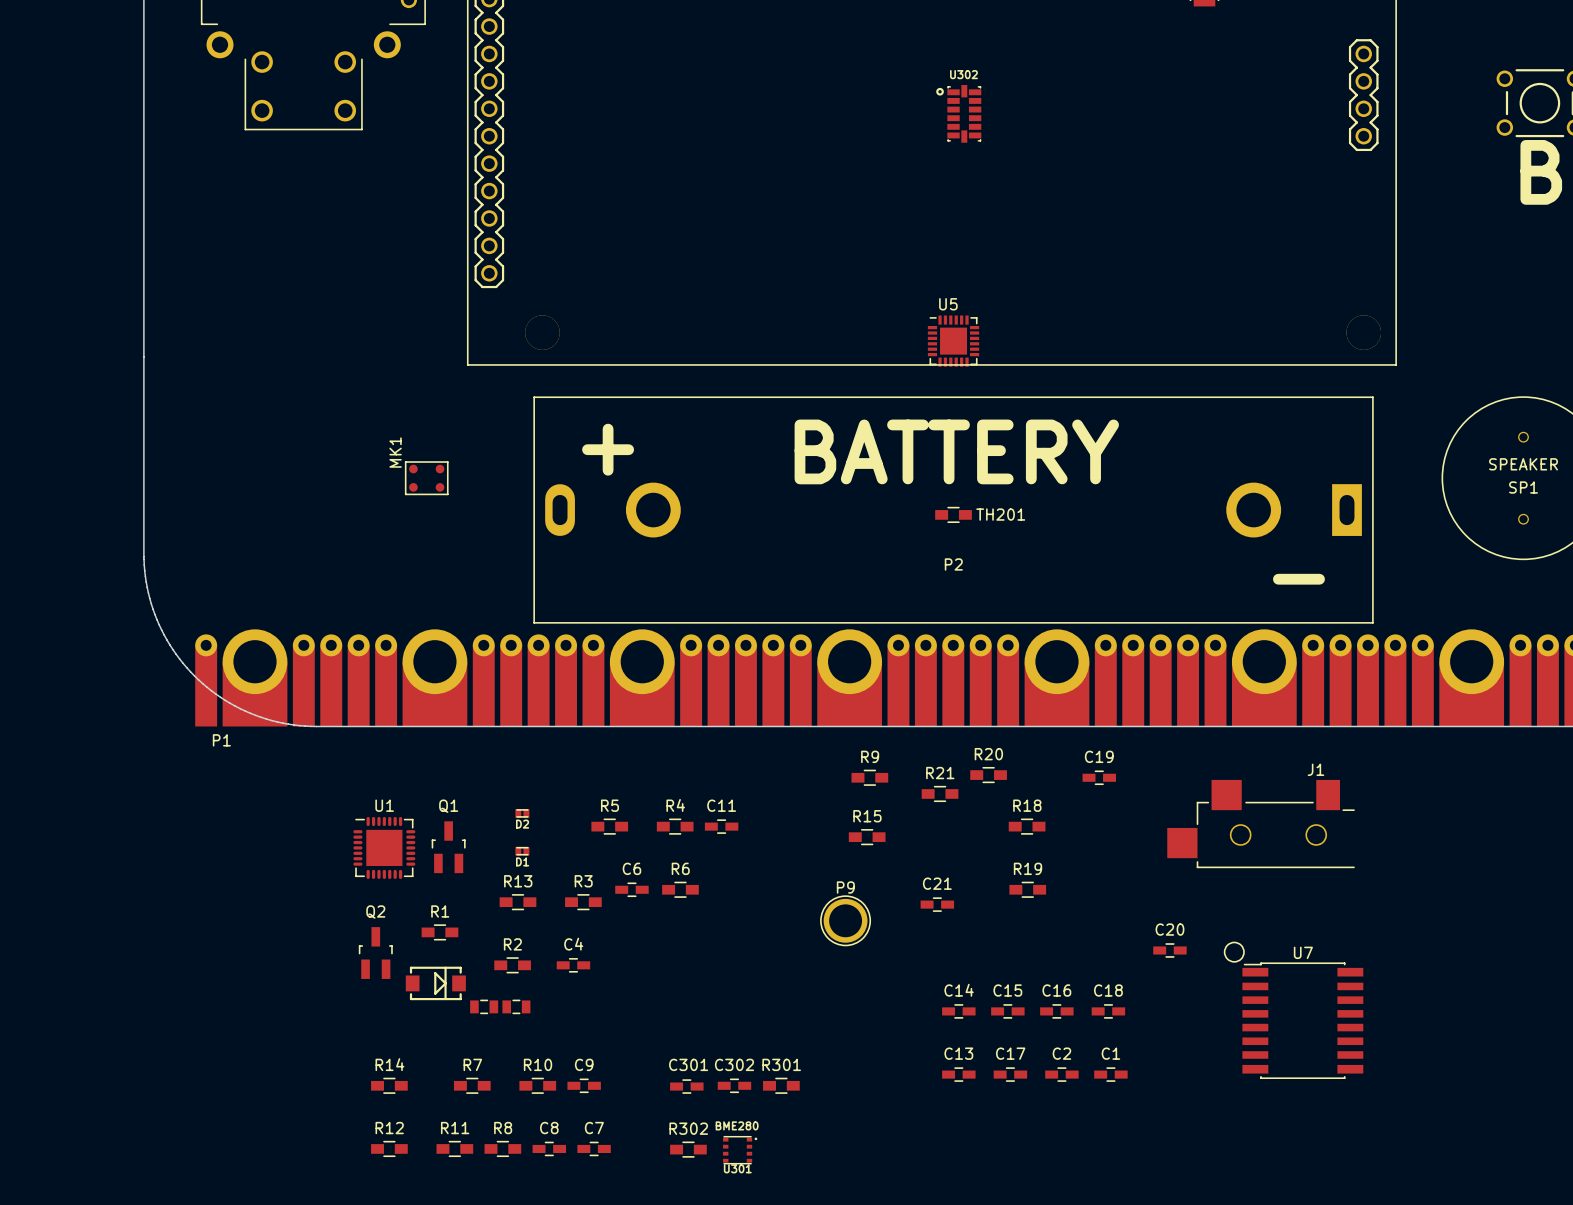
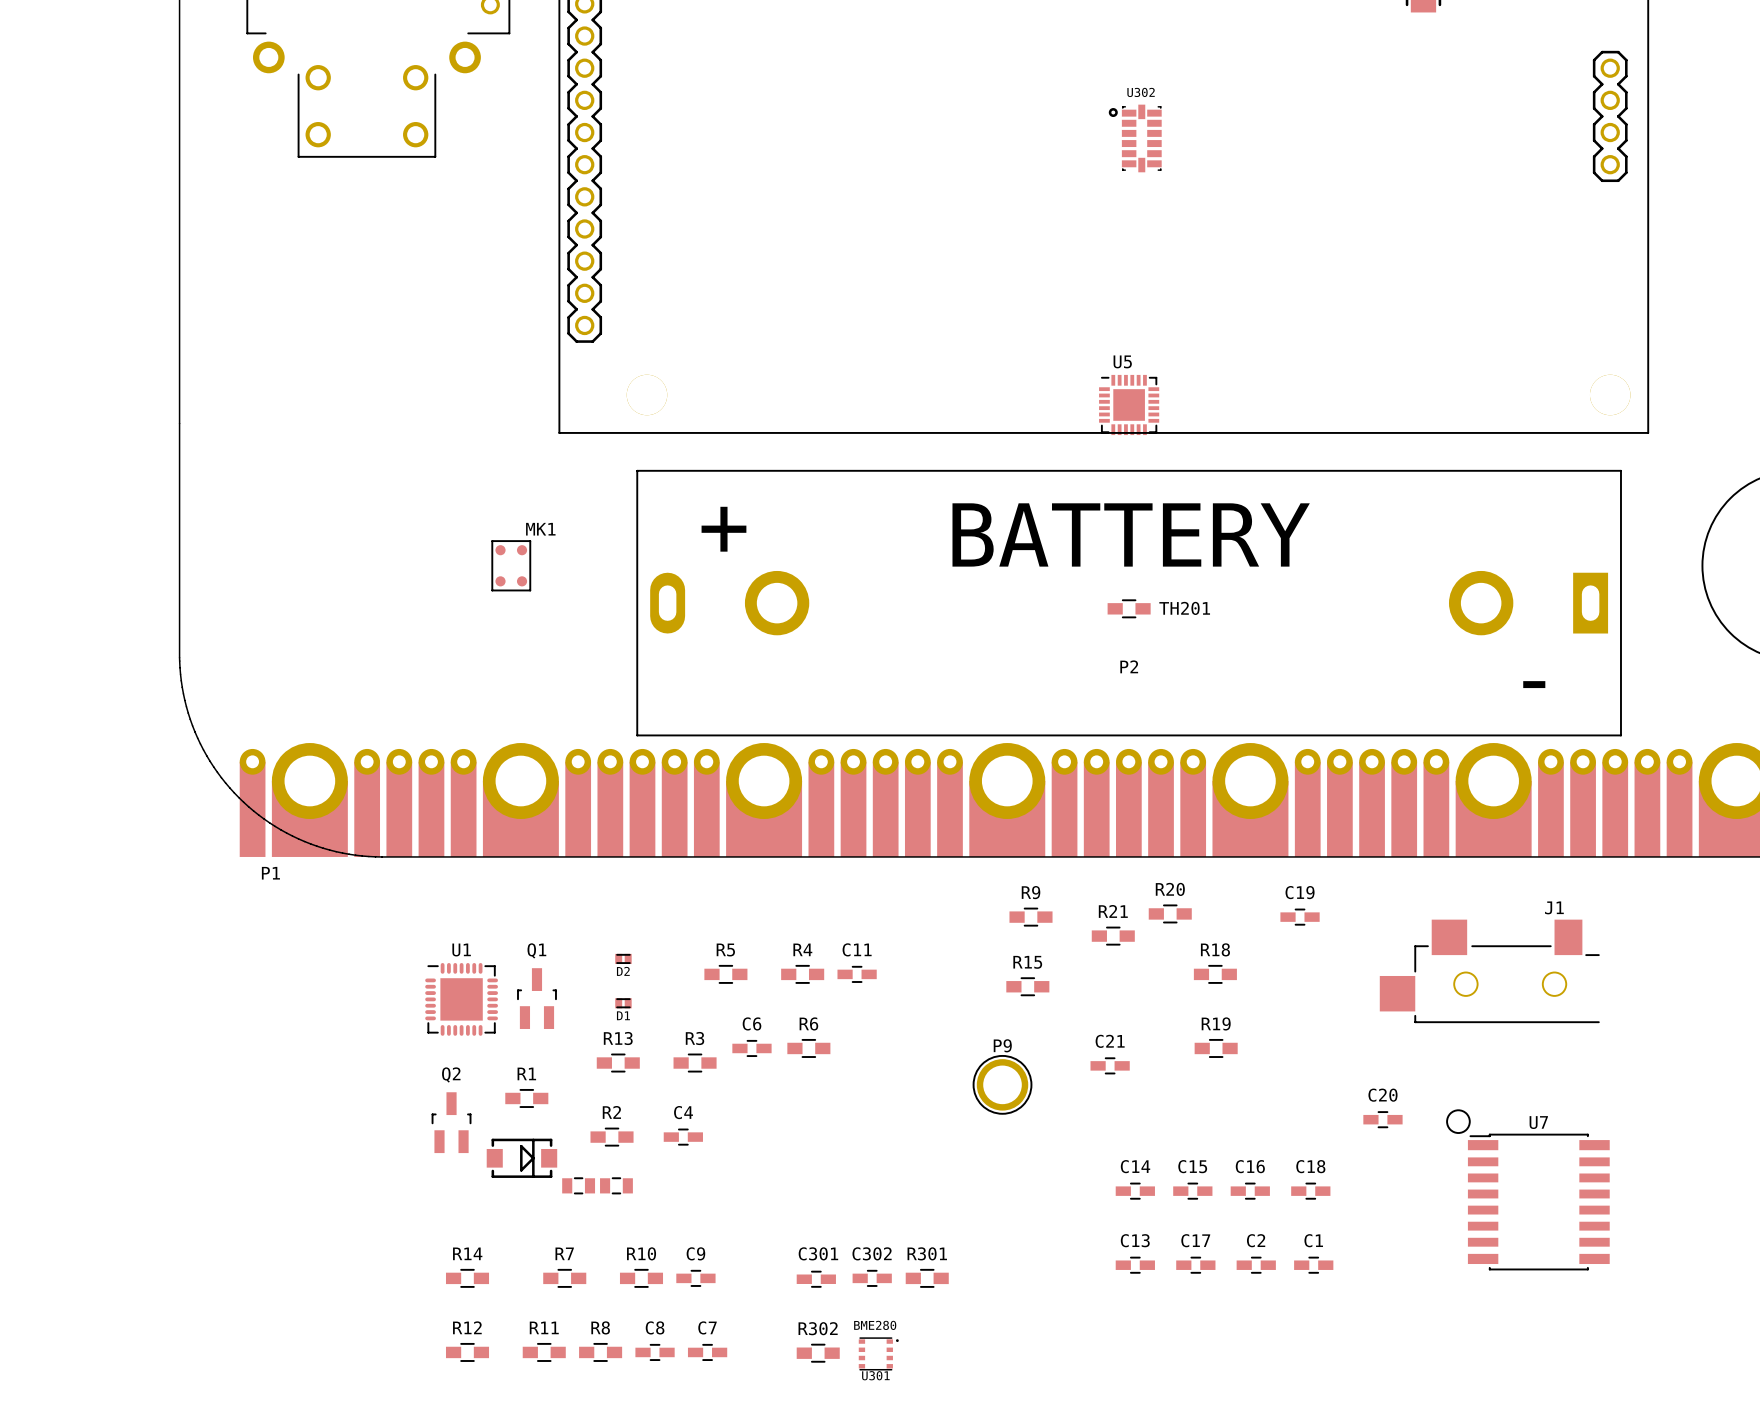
MK1 rotation: 0° (426, 478) -> 90° clockwise (511, 565)

